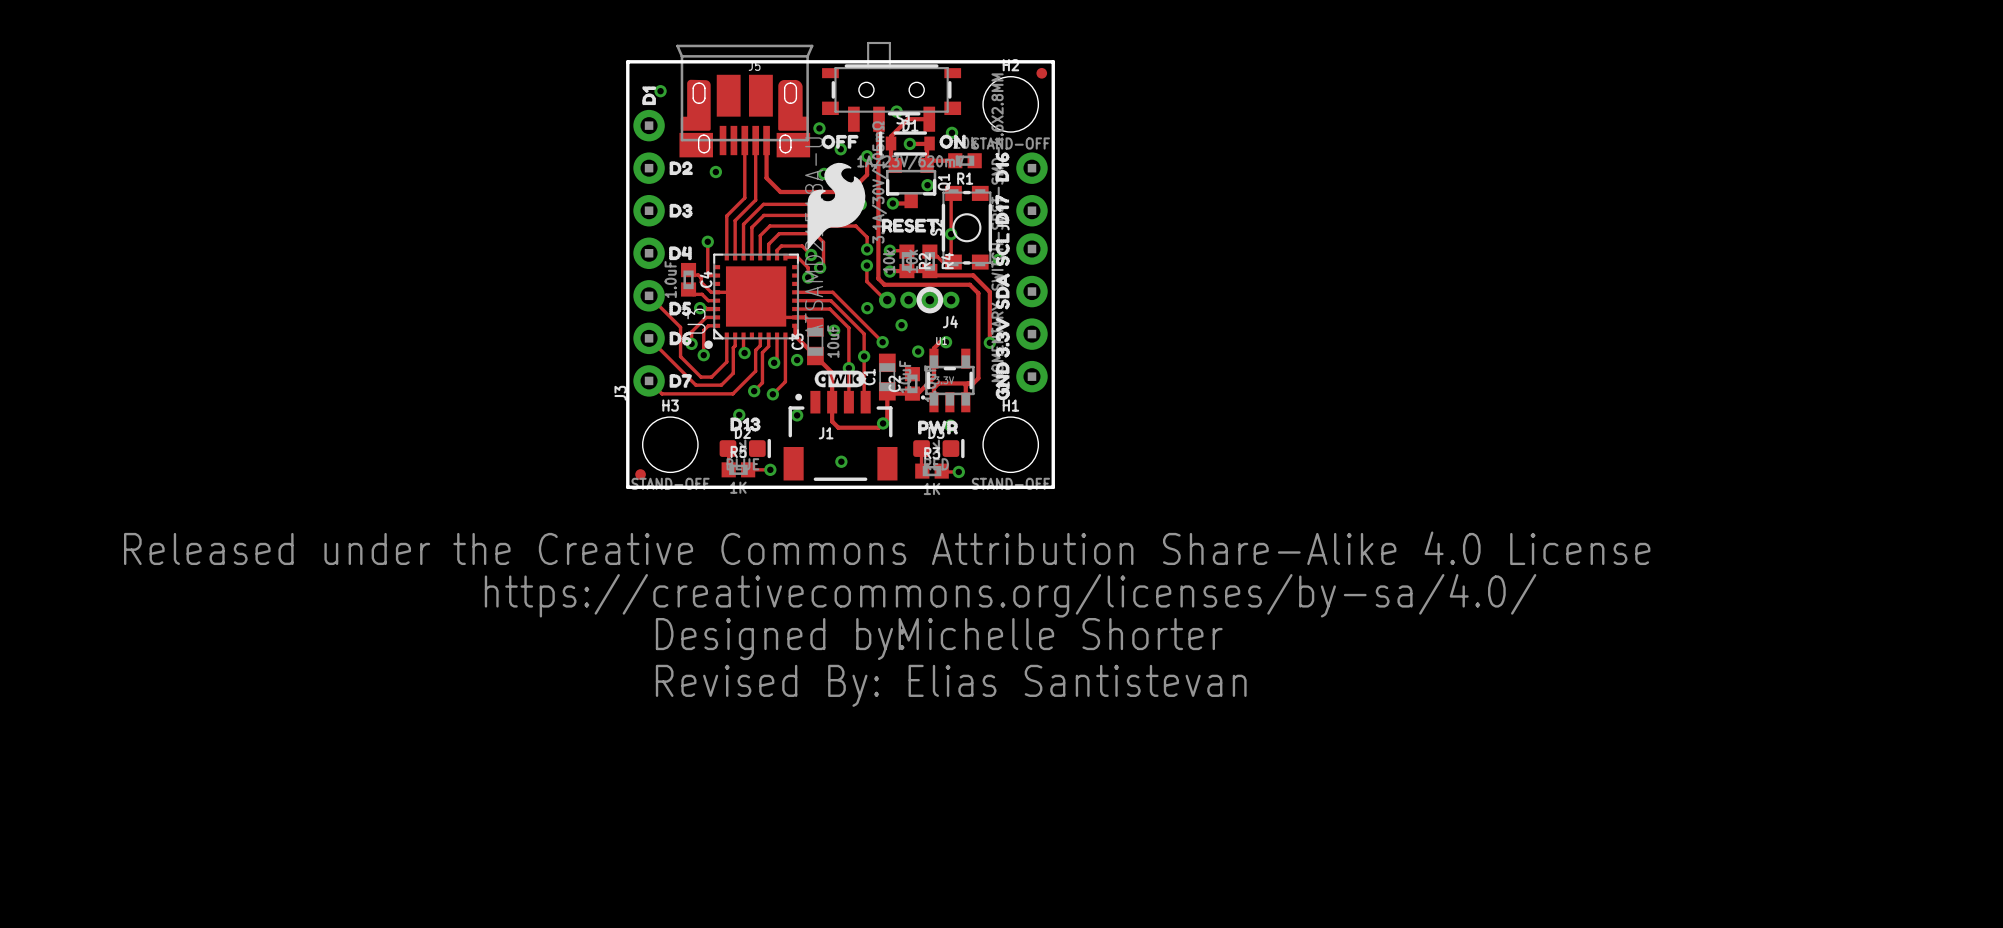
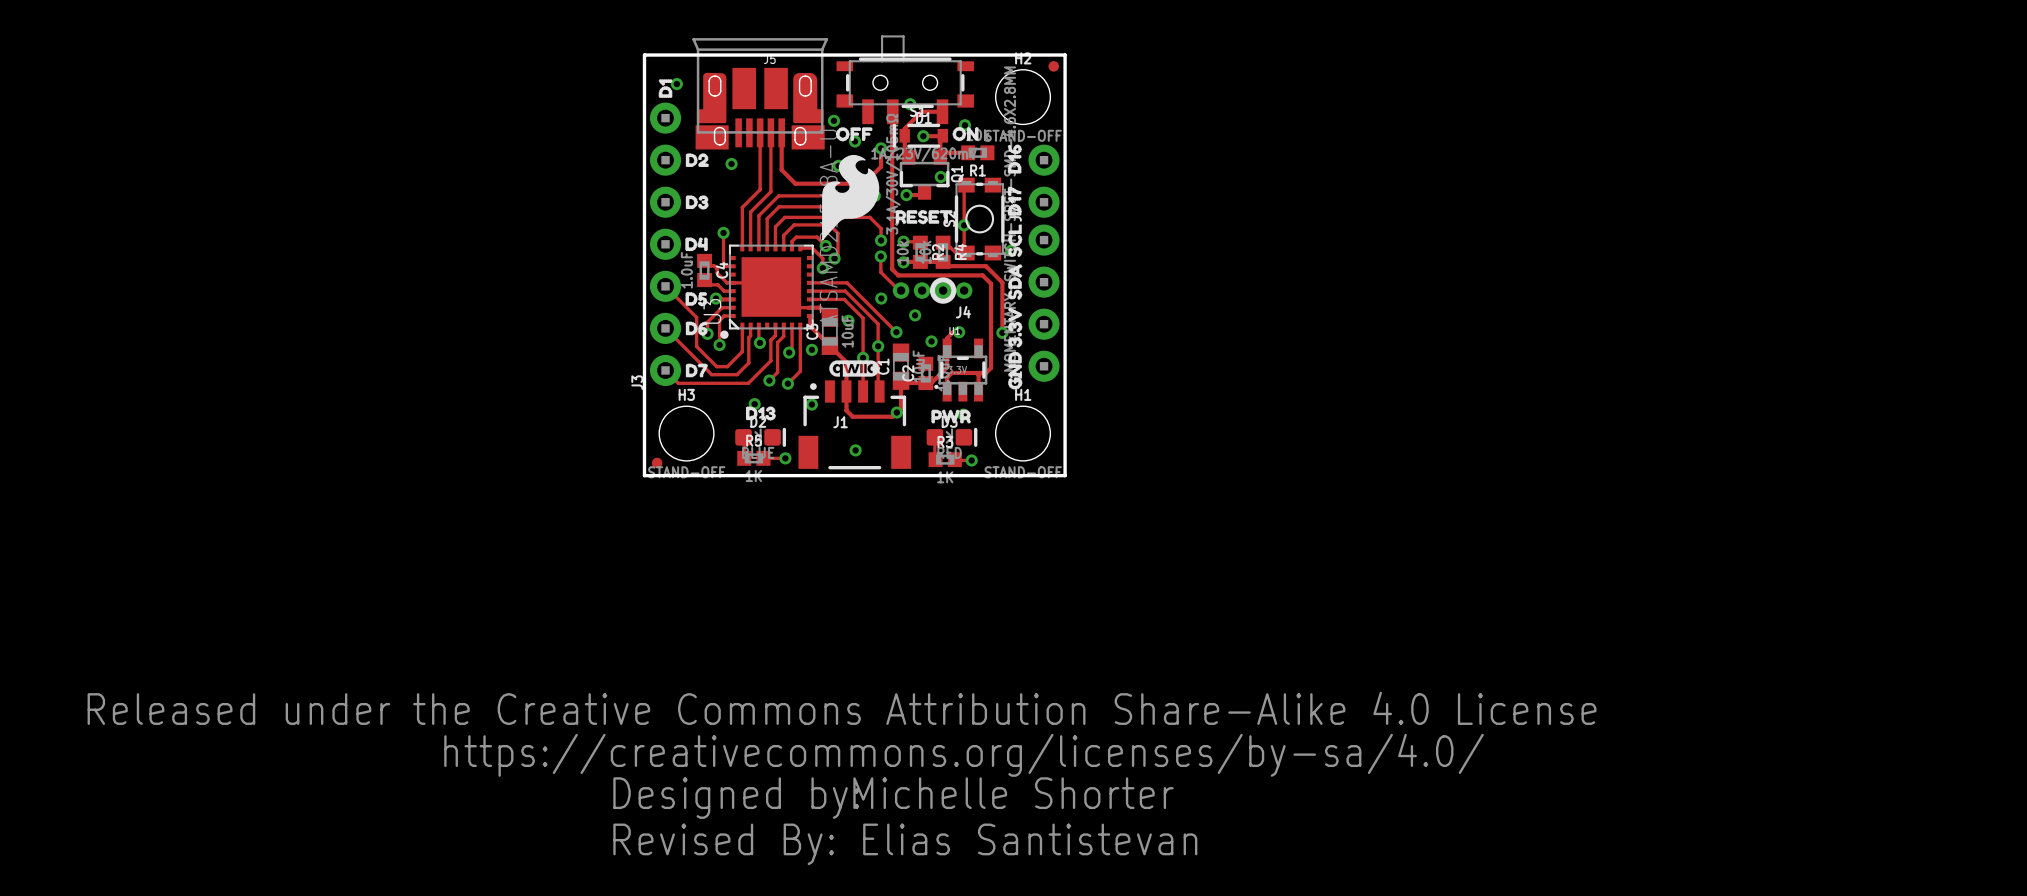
drawing position: (887, 595) -> (842, 755)
text position: Michelle Shorter (1060, 634) -> Michelle Shorter (1013, 793)
text position: Revised By: Elias Santistevan (951, 685) -> Revised By: Elias Santistevan (905, 844)

